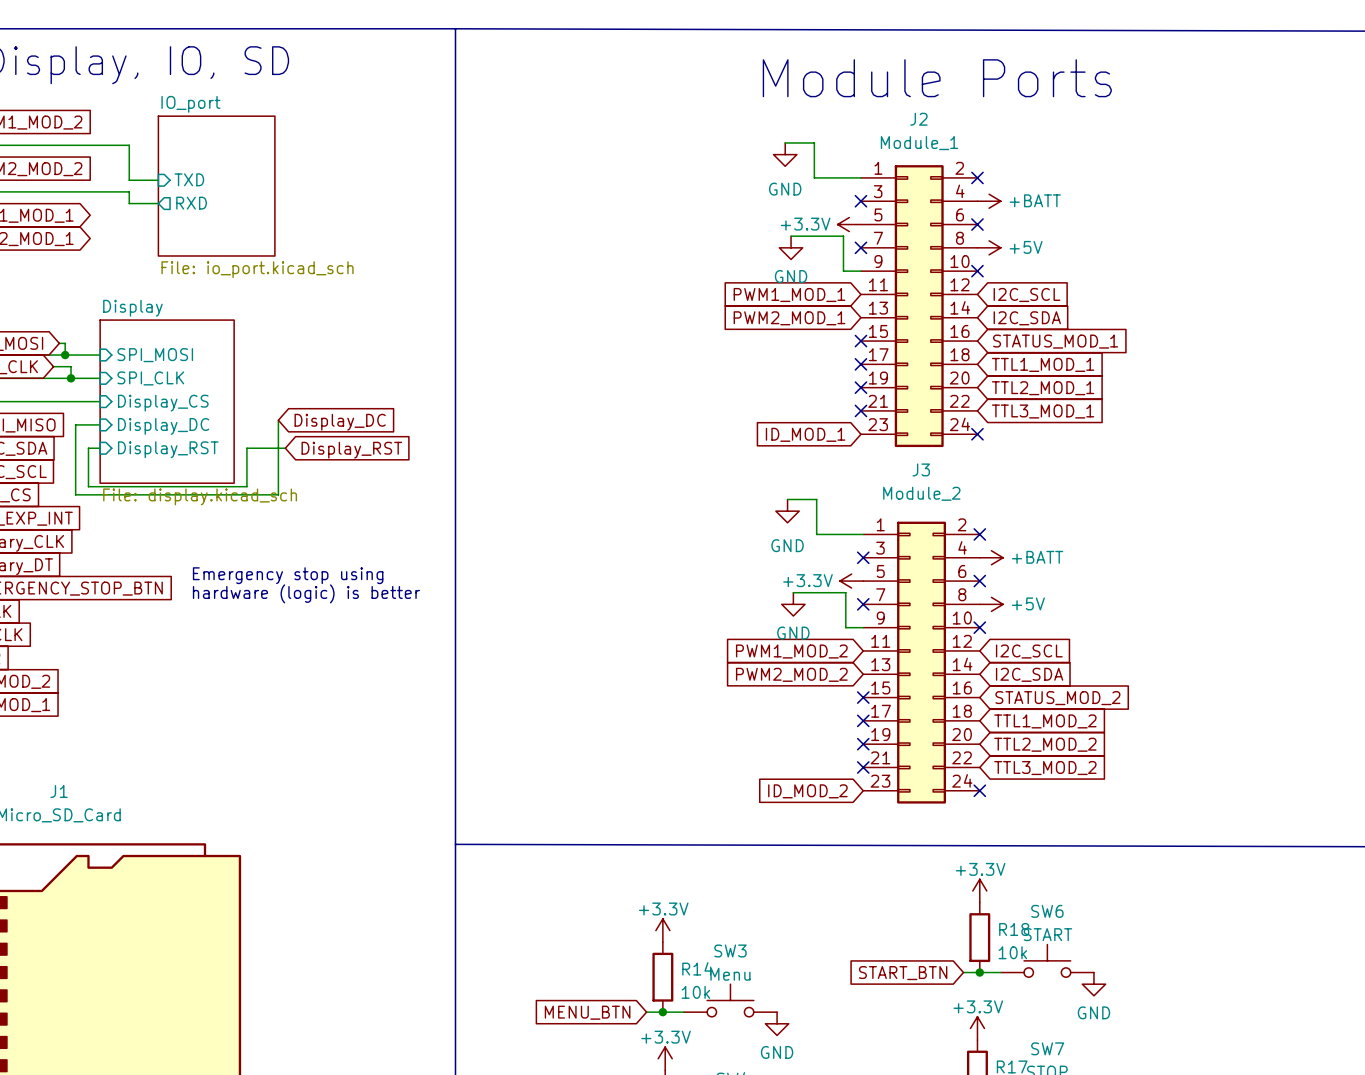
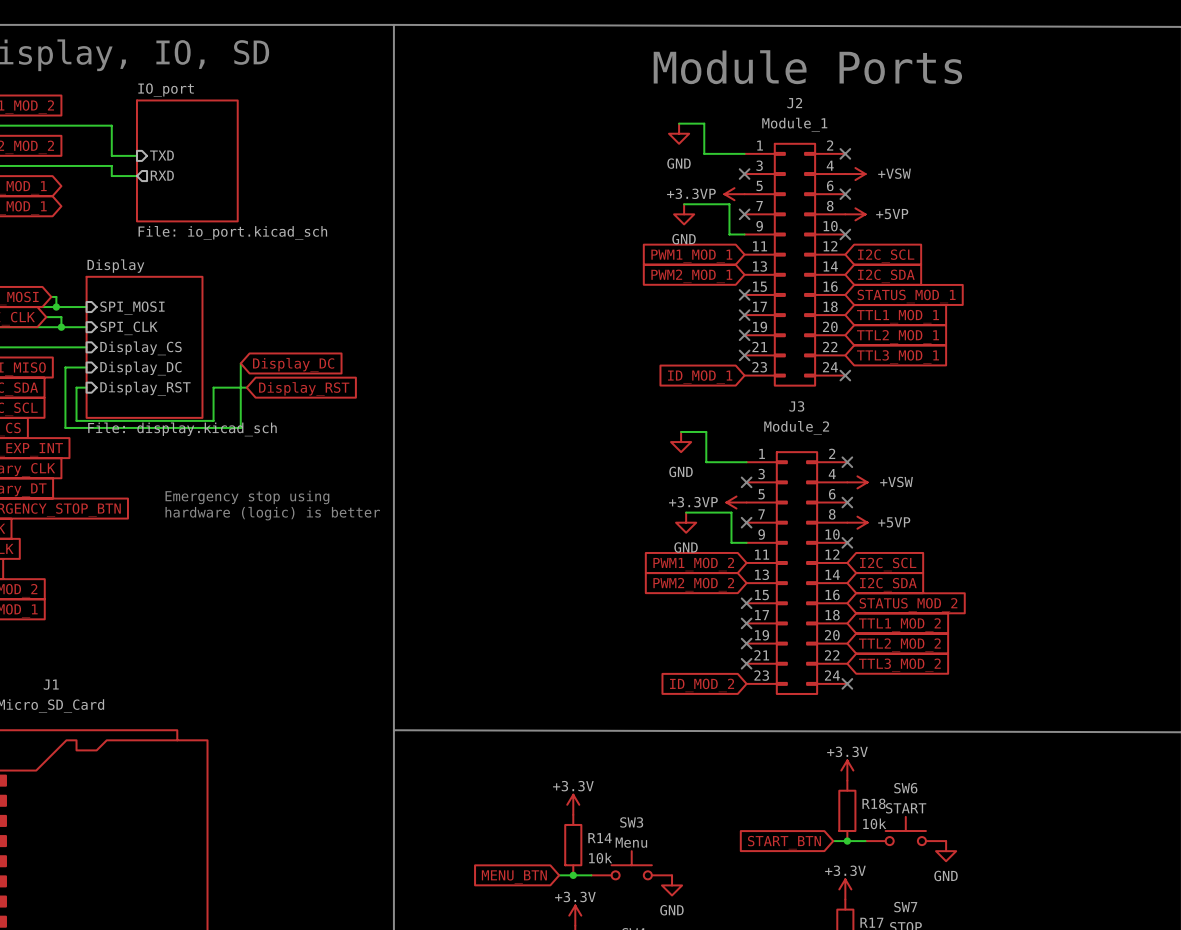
power symbol: +BATT (989, 201) -> +VSW (855, 174)
power symbol: +3.3V (849, 224) -> +3.3VP (734, 194)
power symbol: +5V (989, 247) -> +5VP (855, 214)
power symbol: +BATT (991, 557) -> +VSW (857, 482)
power symbol: +3.3V (851, 581) -> +3.3VP (736, 502)
power symbol: +5V (991, 604) -> +5VP (857, 522)

